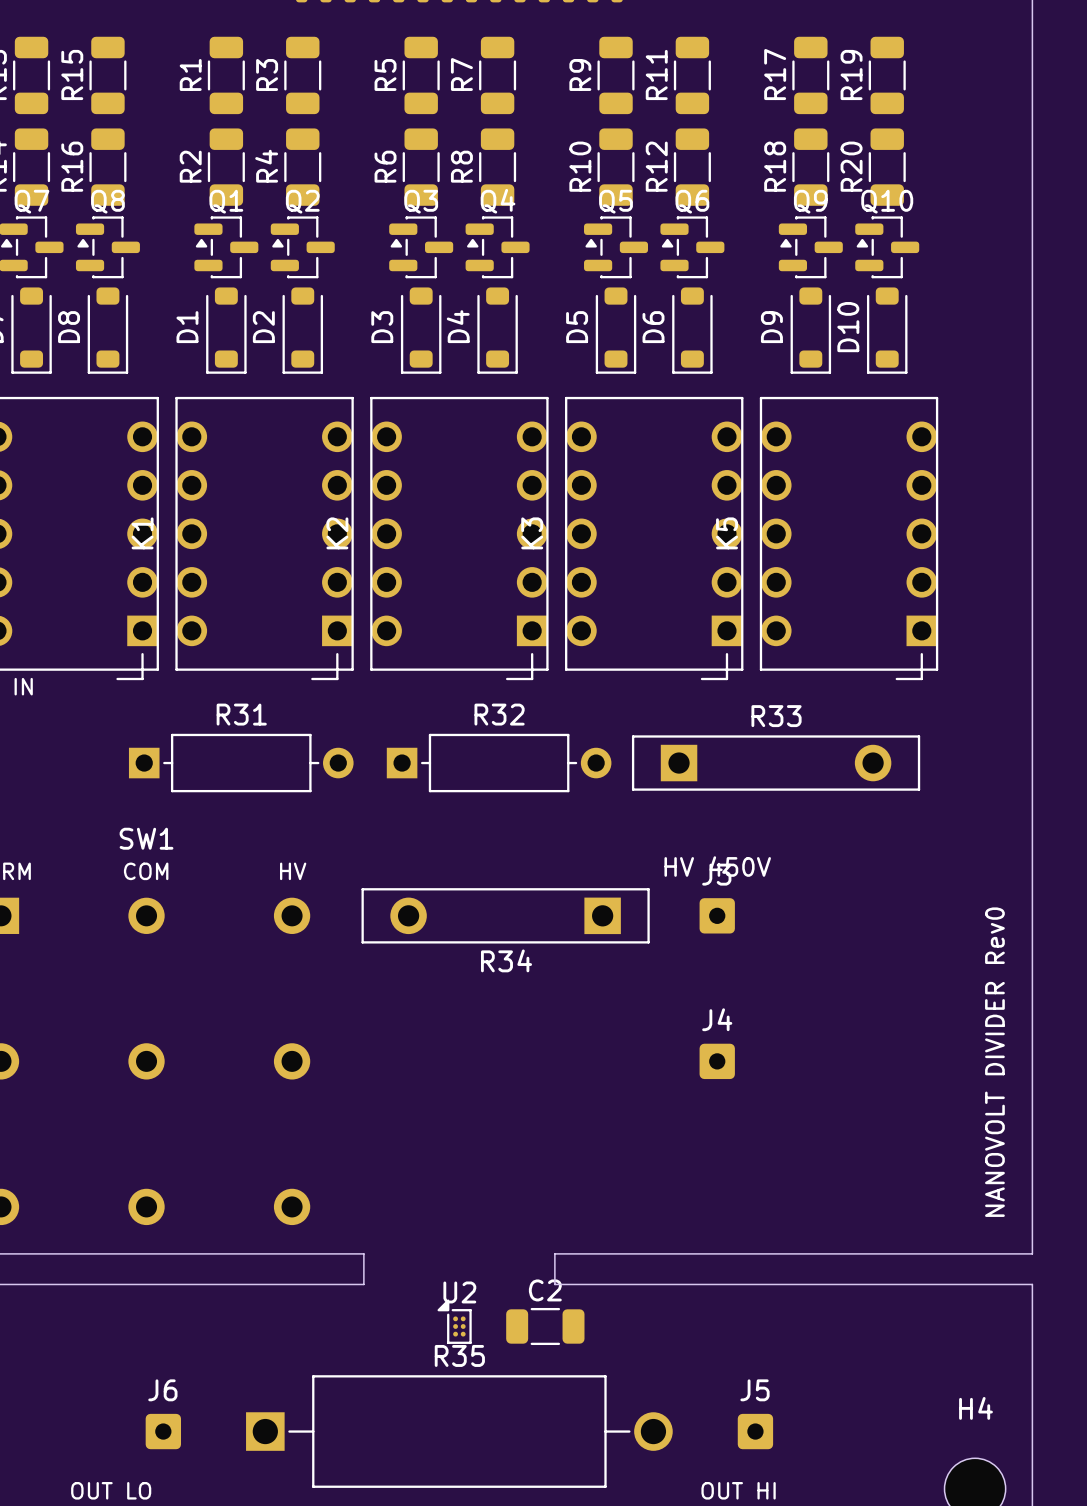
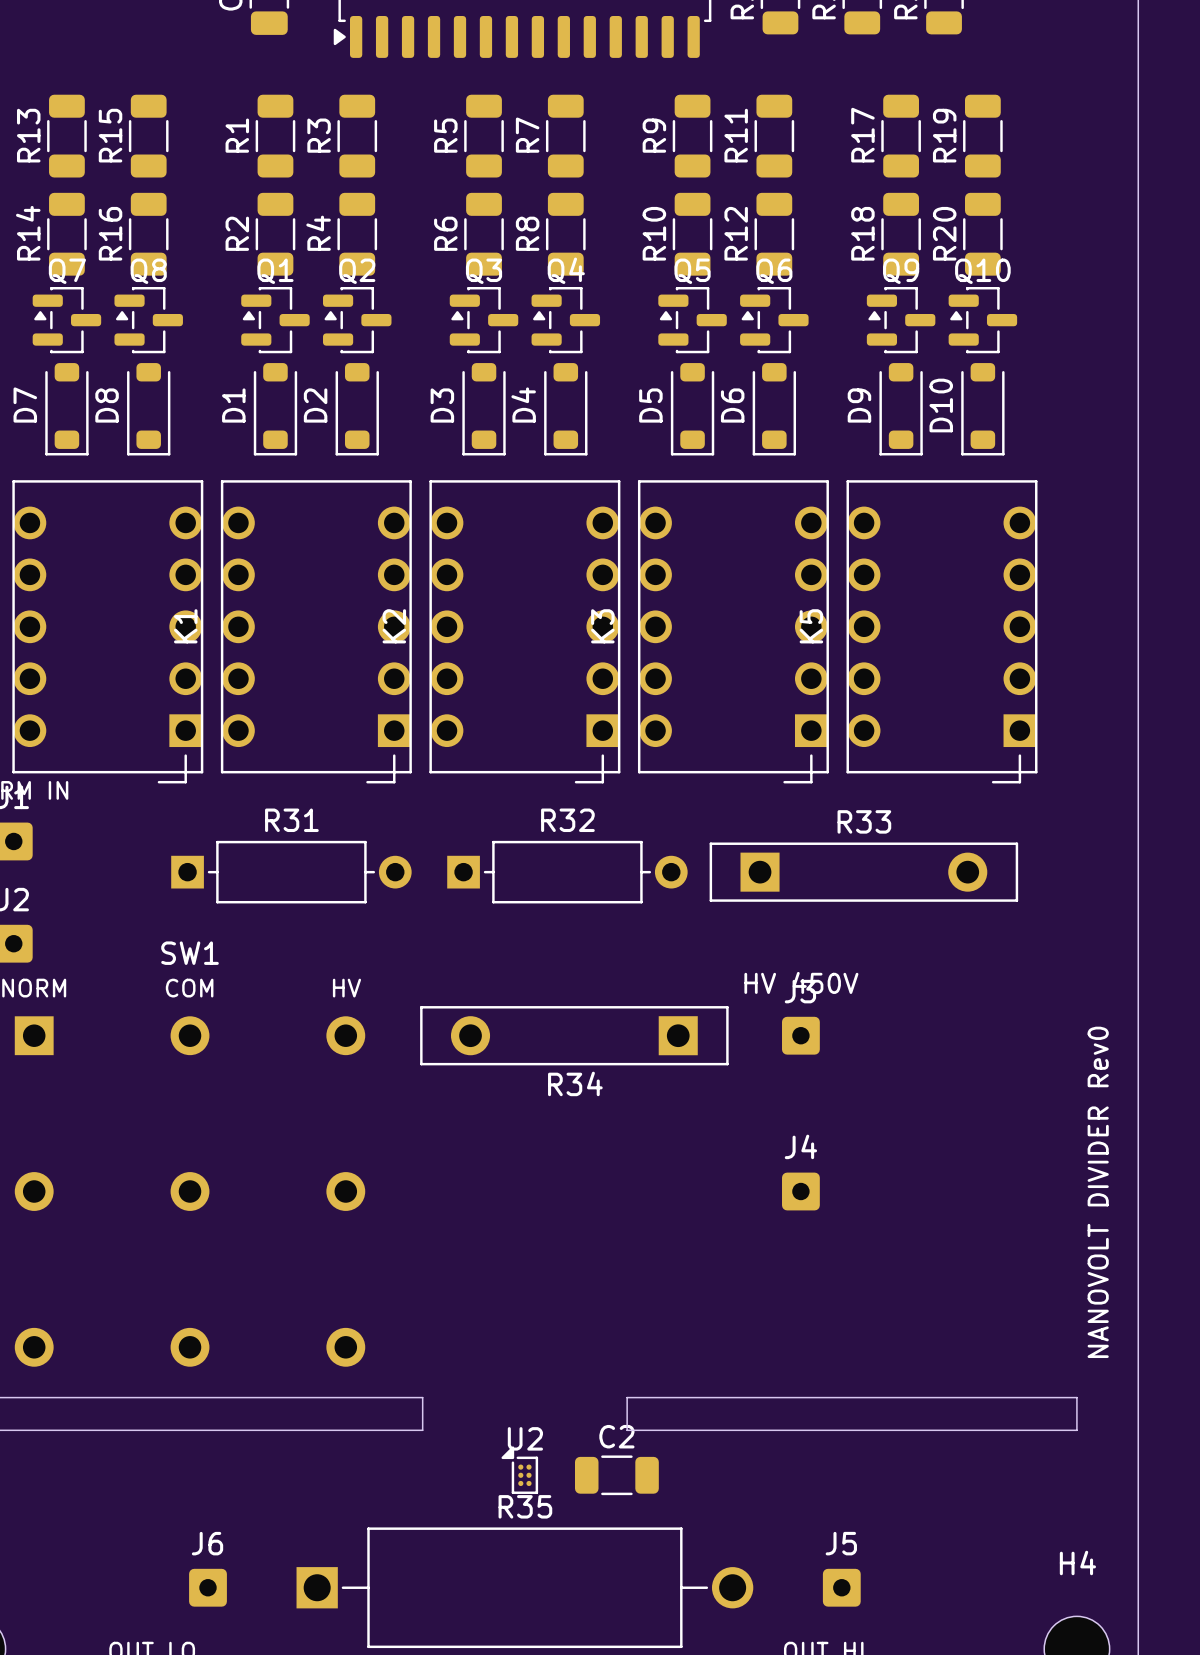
board edge: (975, 1253) (1032, 1253) -> (1076, 1397) (1076, 1430)
board edge: (975, 1284) (1032, 1284) -> (1138, 1397) (1138, 1430)

